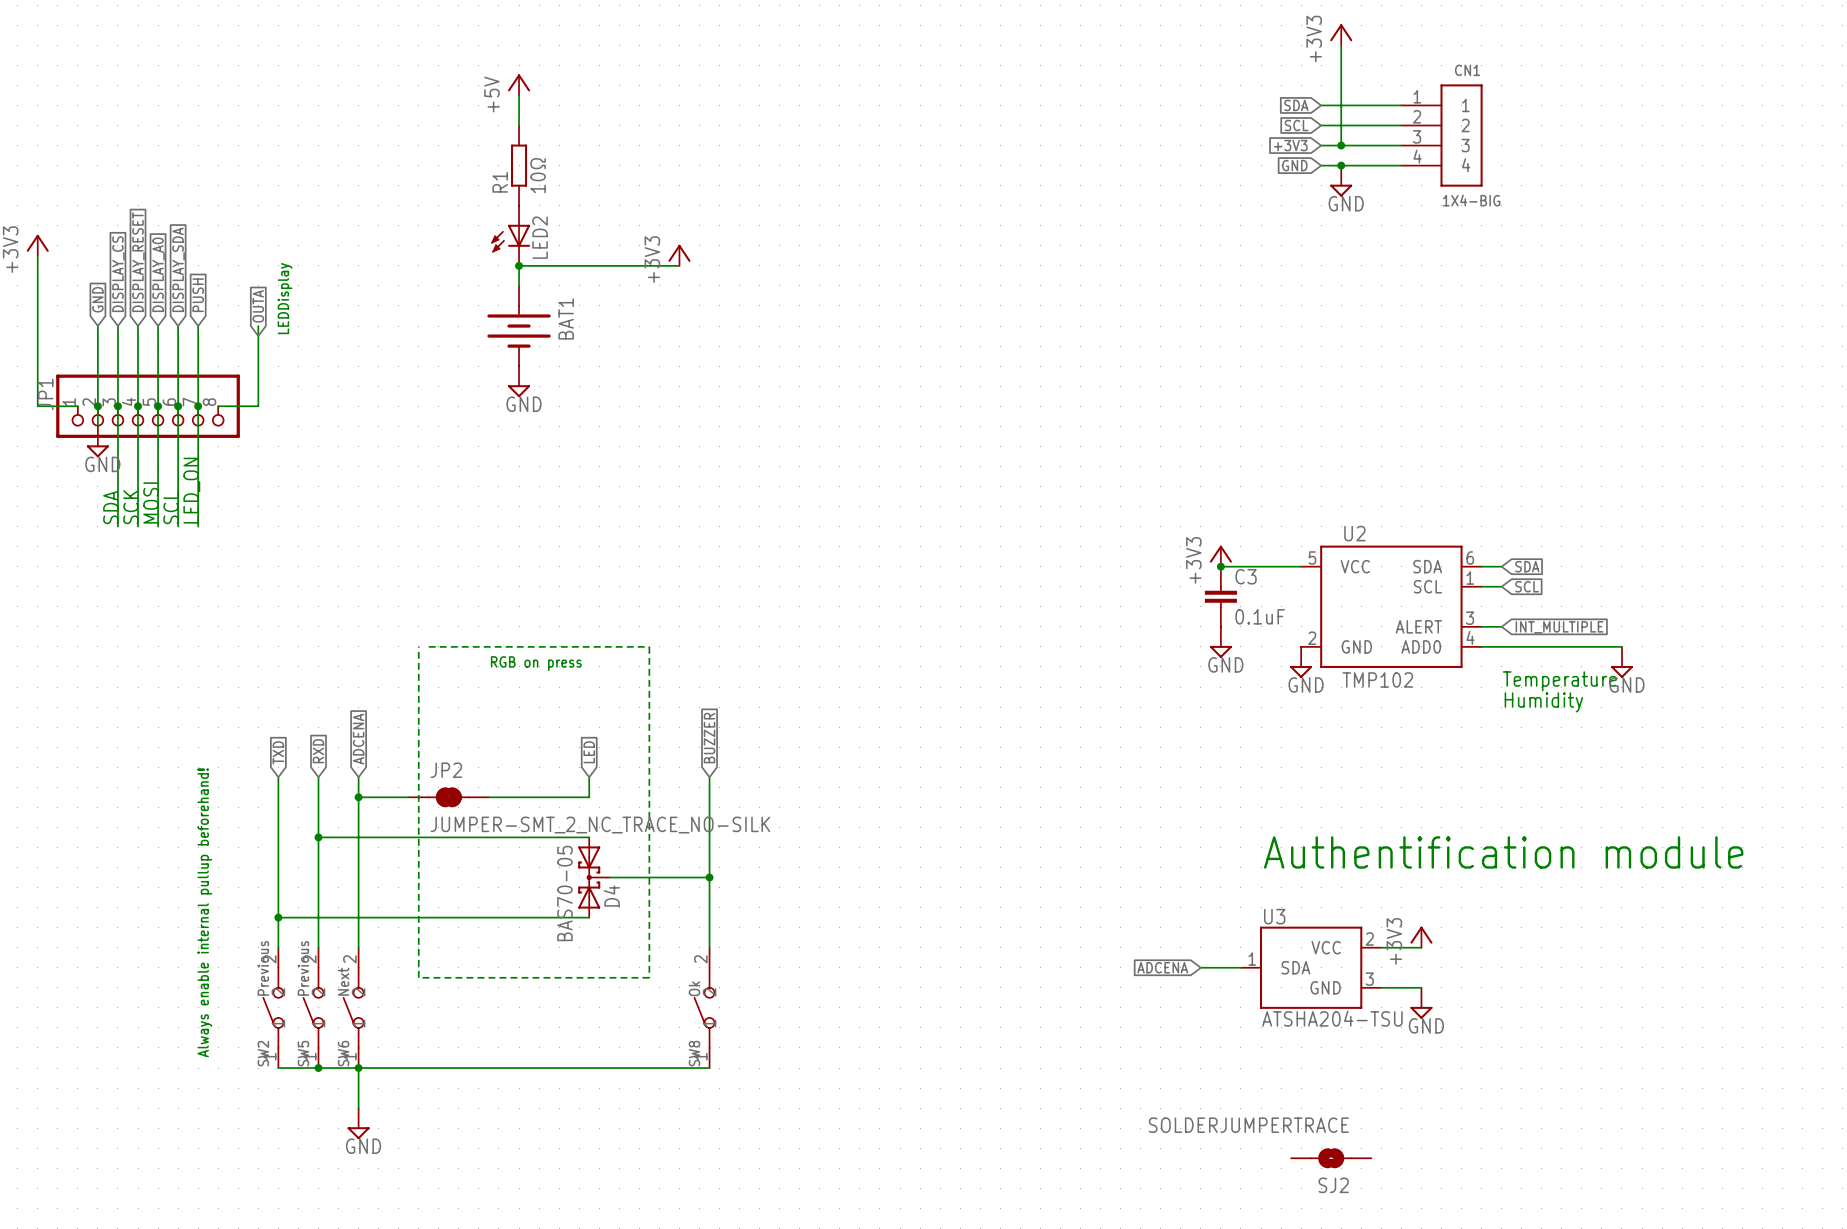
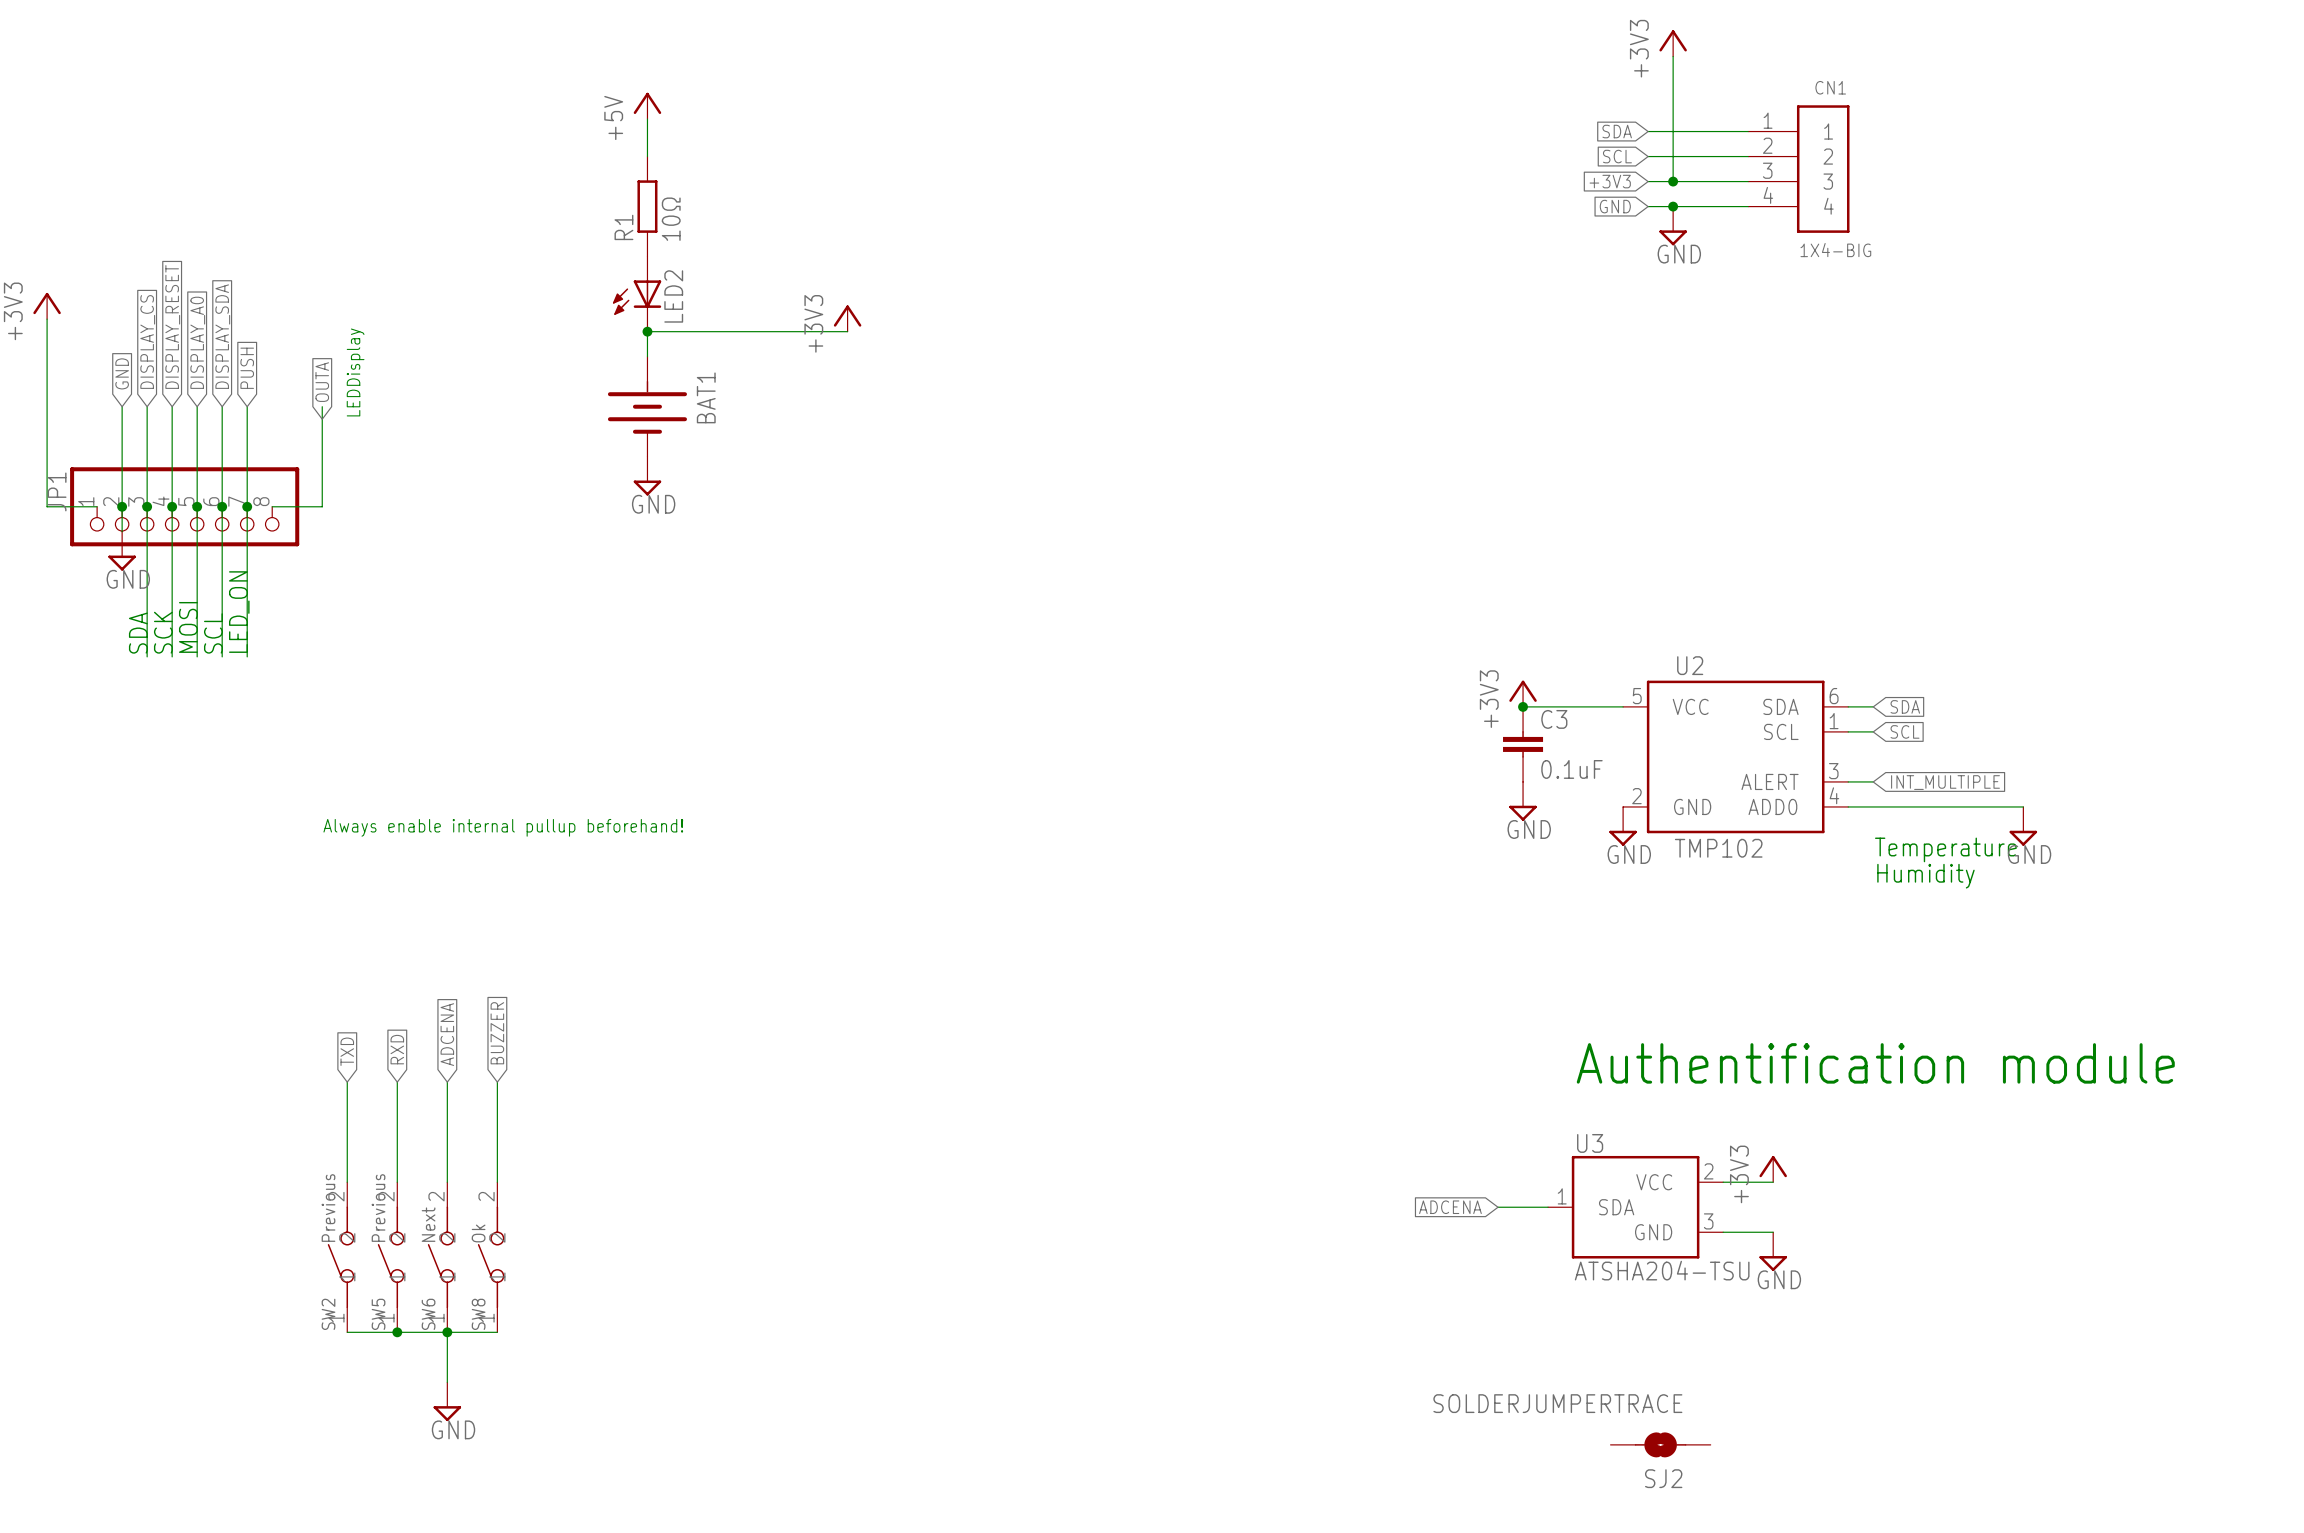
wire: (418, 646) (418, 977) (649, 977) (649, 646) (428, 646) -> none
text: none -> Always enable internal pullup beforehand! (503, 827)
text: RGB on press (536, 663) -> none
global label: BUZZER (709, 738) -> none
global label position: ADCENA (358, 739) -> ADCENA (447, 1034)
global label position: RXD (318, 751) -> RXD (397, 1049)
global label position: TXD (278, 752) -> TXD (347, 1051)
global label: LED (589, 752) -> none
wire: (278, 777) (278, 867) -> none
wire: (318, 777) (318, 867) -> none
wire: (358, 777) (358, 867) -> none
wire: (589, 777) (589, 797) (488, 797) -> none
wire: (709, 777) (709, 947) -> none
wire: (358, 797) (408, 797) -> none
junction: (358, 797) -> none
JP2: JUMPER-SMT_2_NC_TRACE_NO-SILK (448, 797) -> none
global label: none -> BUZZER (497, 1033)
wire: (318, 837) (589, 837) -> none
junction: (318, 837) -> none
wire: none -> (497, 1082) (497, 1182)
D4: BAS70-05 (593, 877) -> none
wire: (609, 877) (709, 877) -> none
junction: (709, 877) -> none
text: Always enable internal pullup beforehand! (204, 912) -> none
wire: (278, 917) (589, 917) -> none
junction: (278, 917) -> none
SW8 position: (704, 1007) -> (491, 1257)
wire: (398, 1068) (709, 1068) -> none

